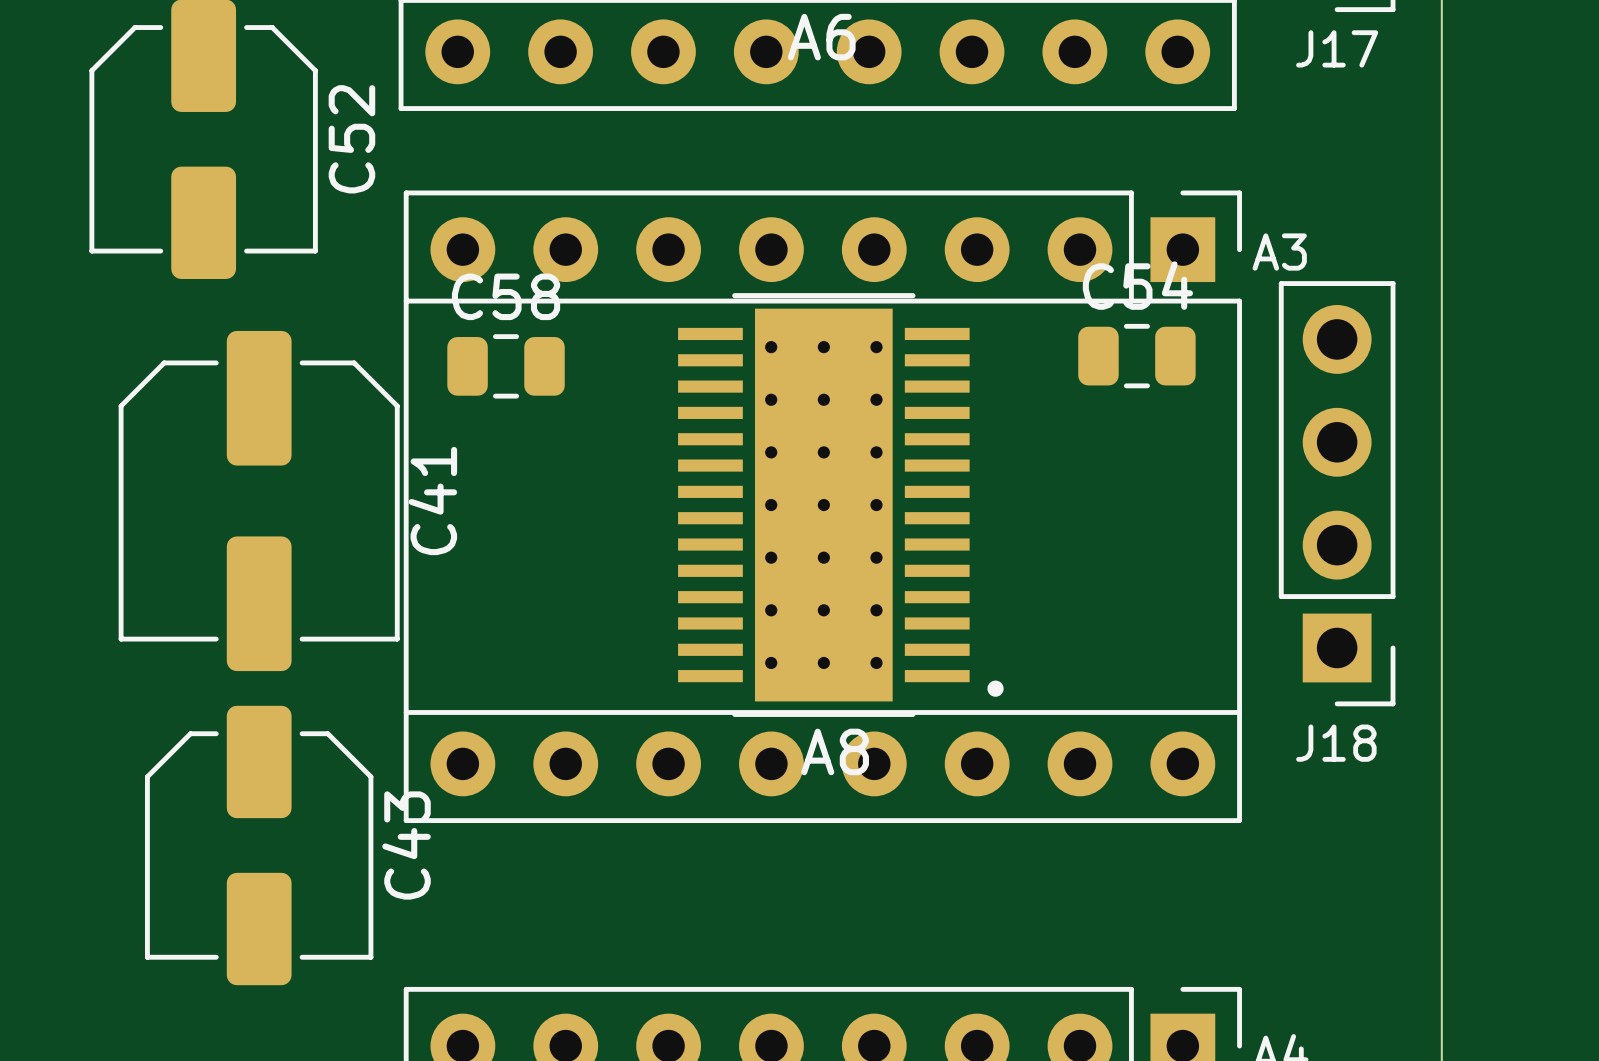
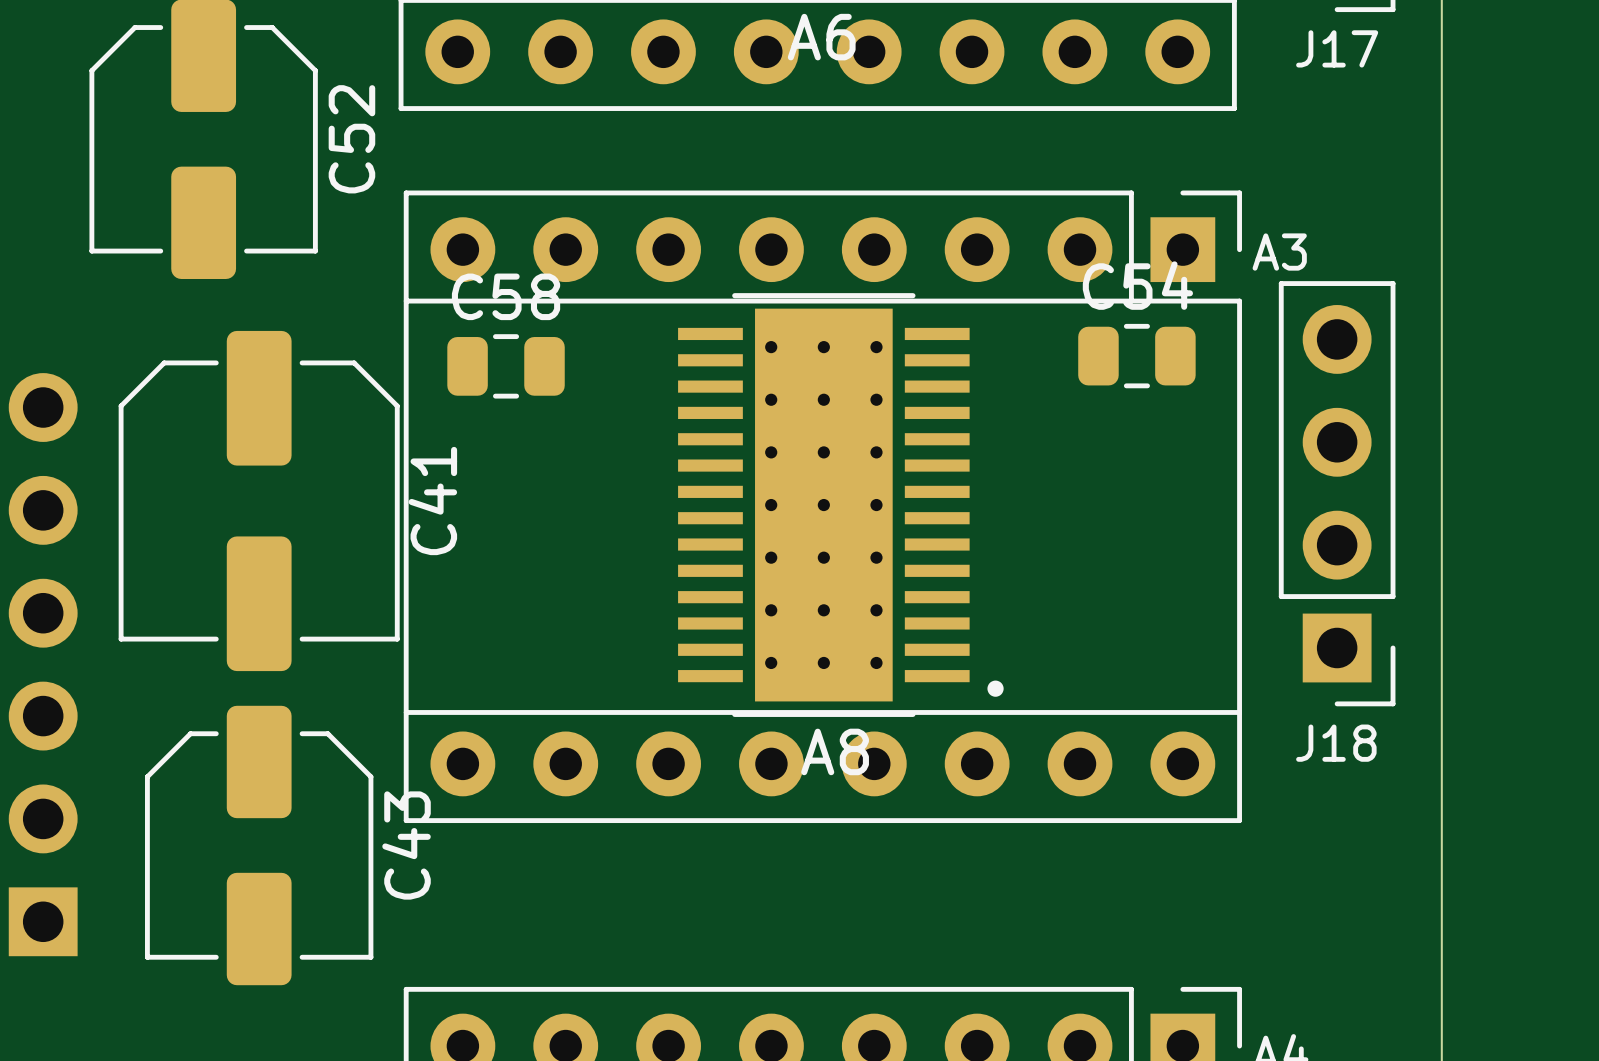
part: none -> (43, 664)

